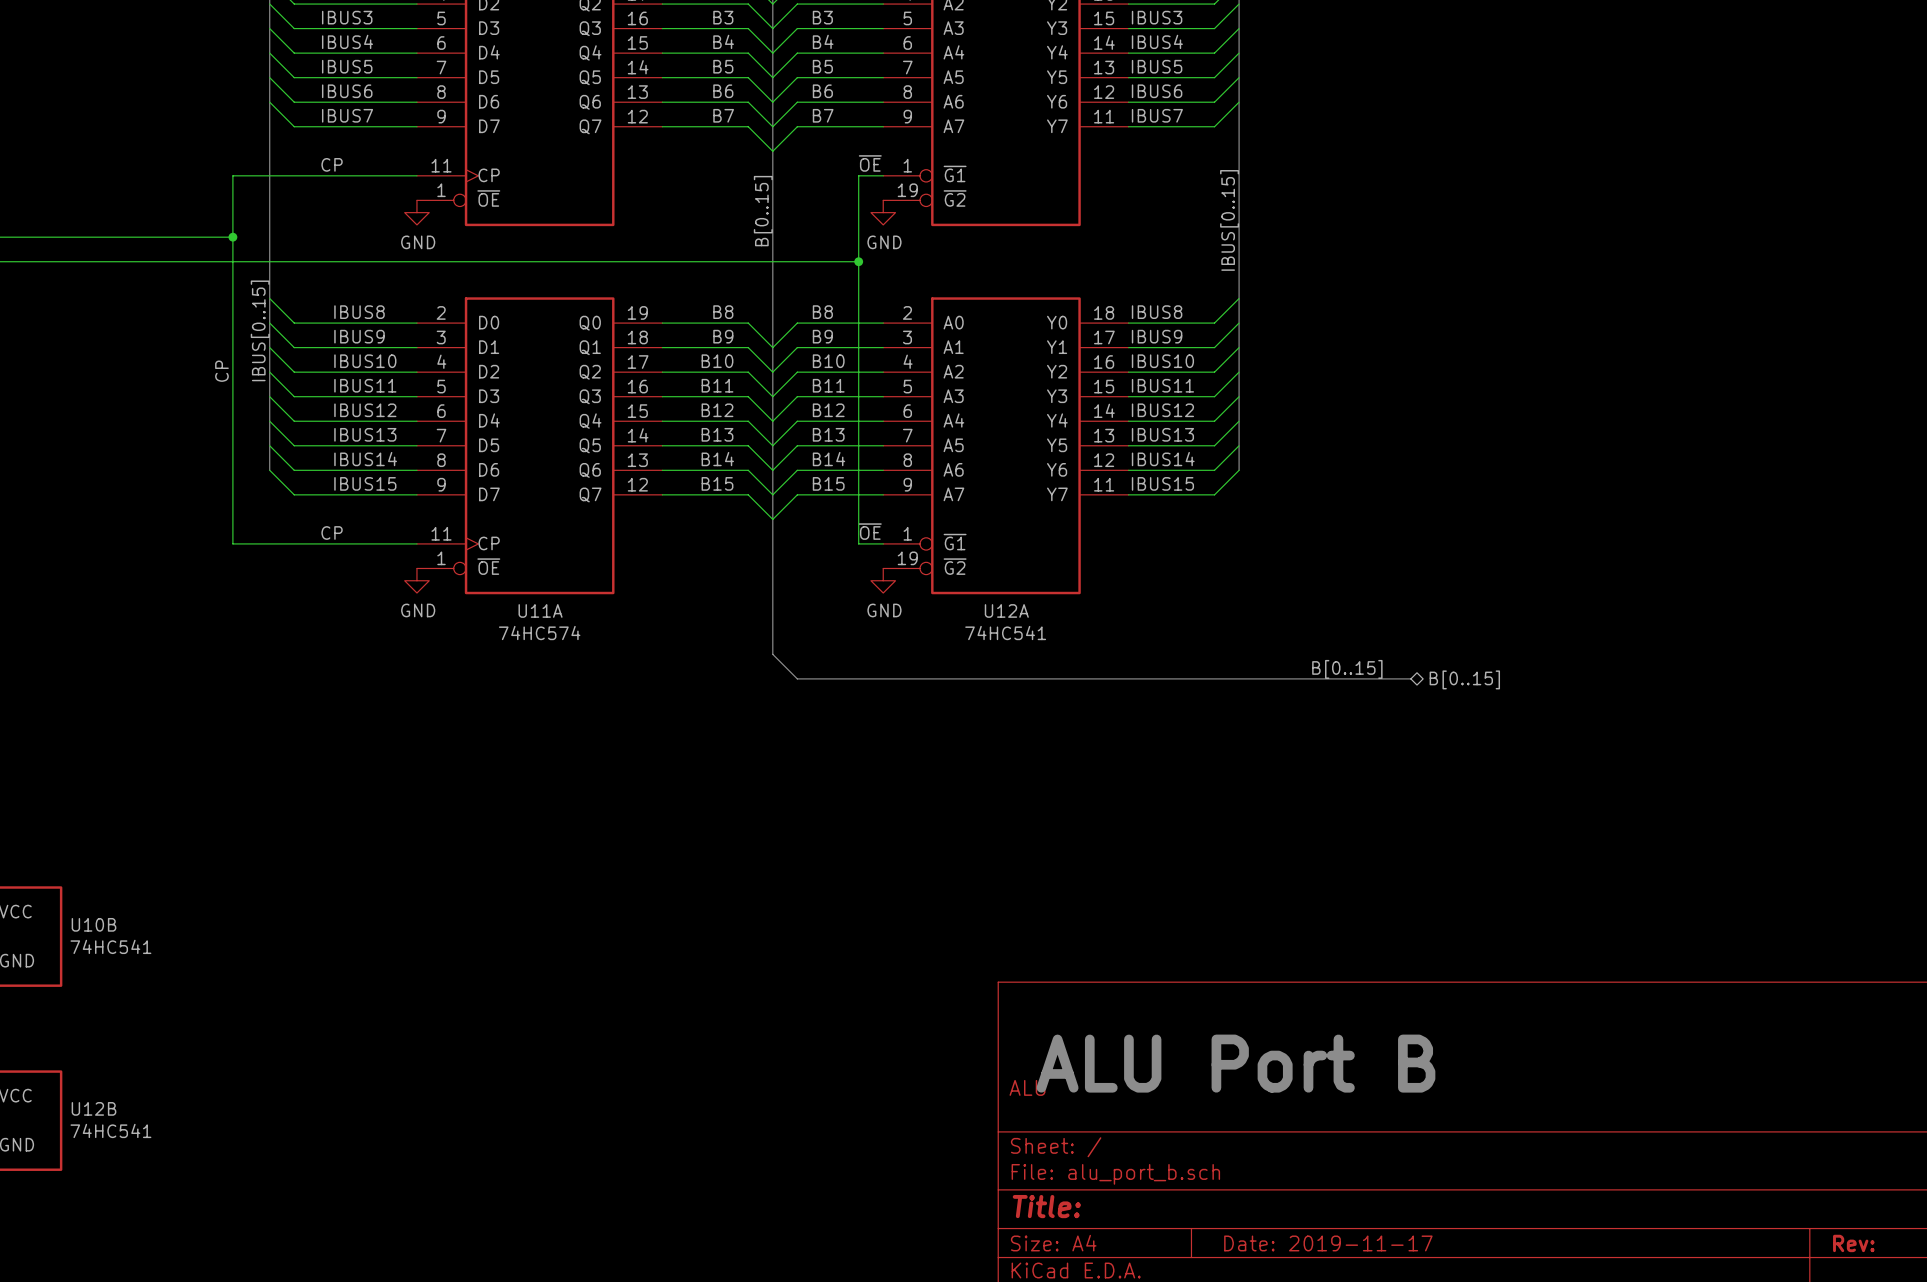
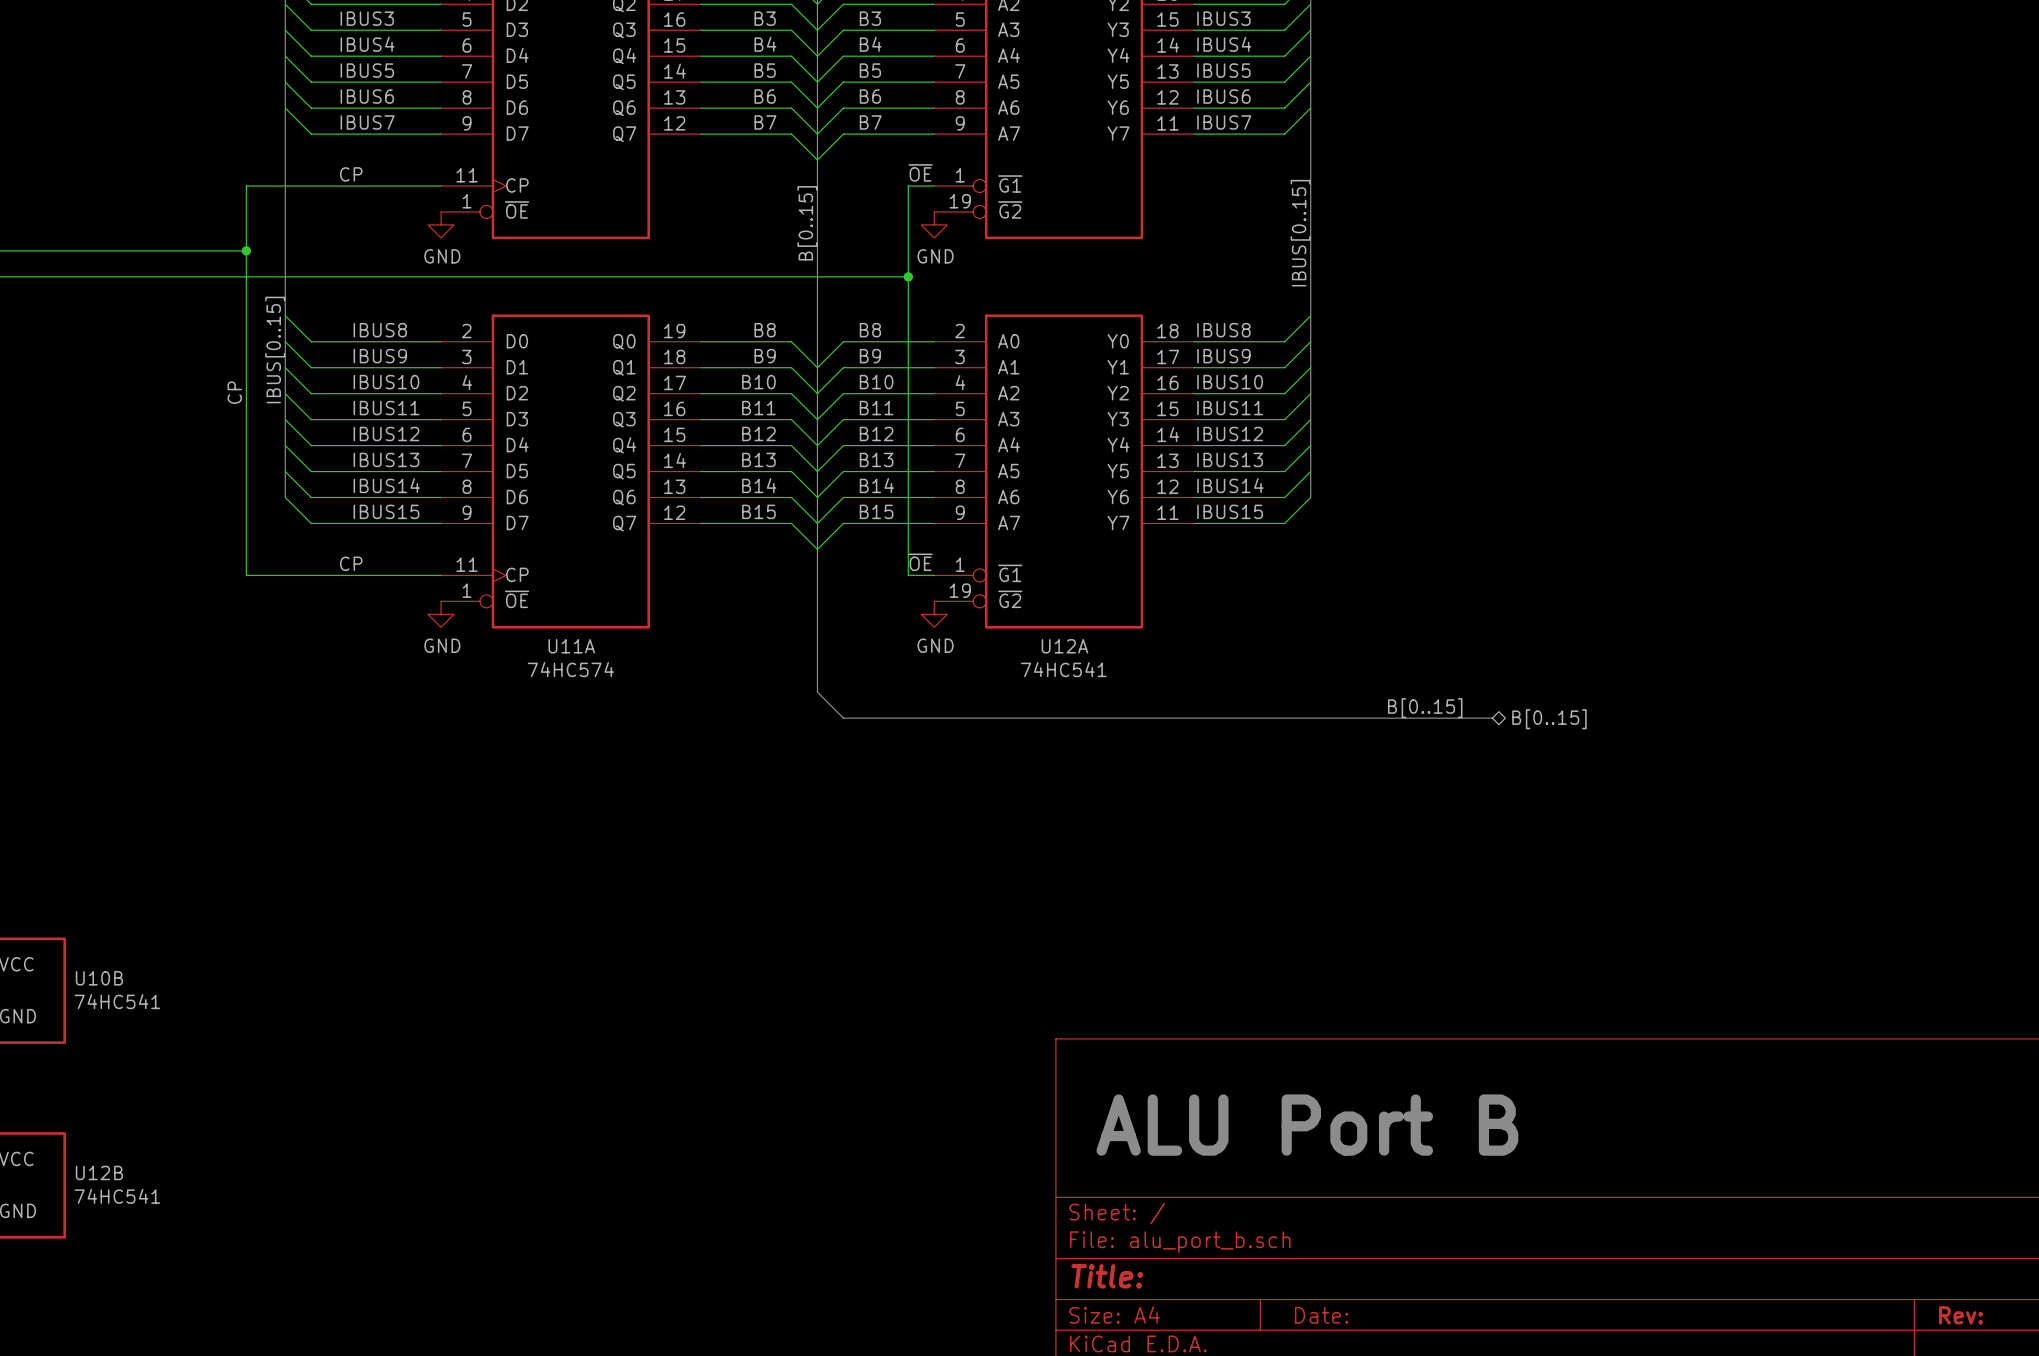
title block: ALU (1027, 1087) -> none
title block: Date: 2019-11-17 (1328, 1243) -> Date: (1321, 1315)

